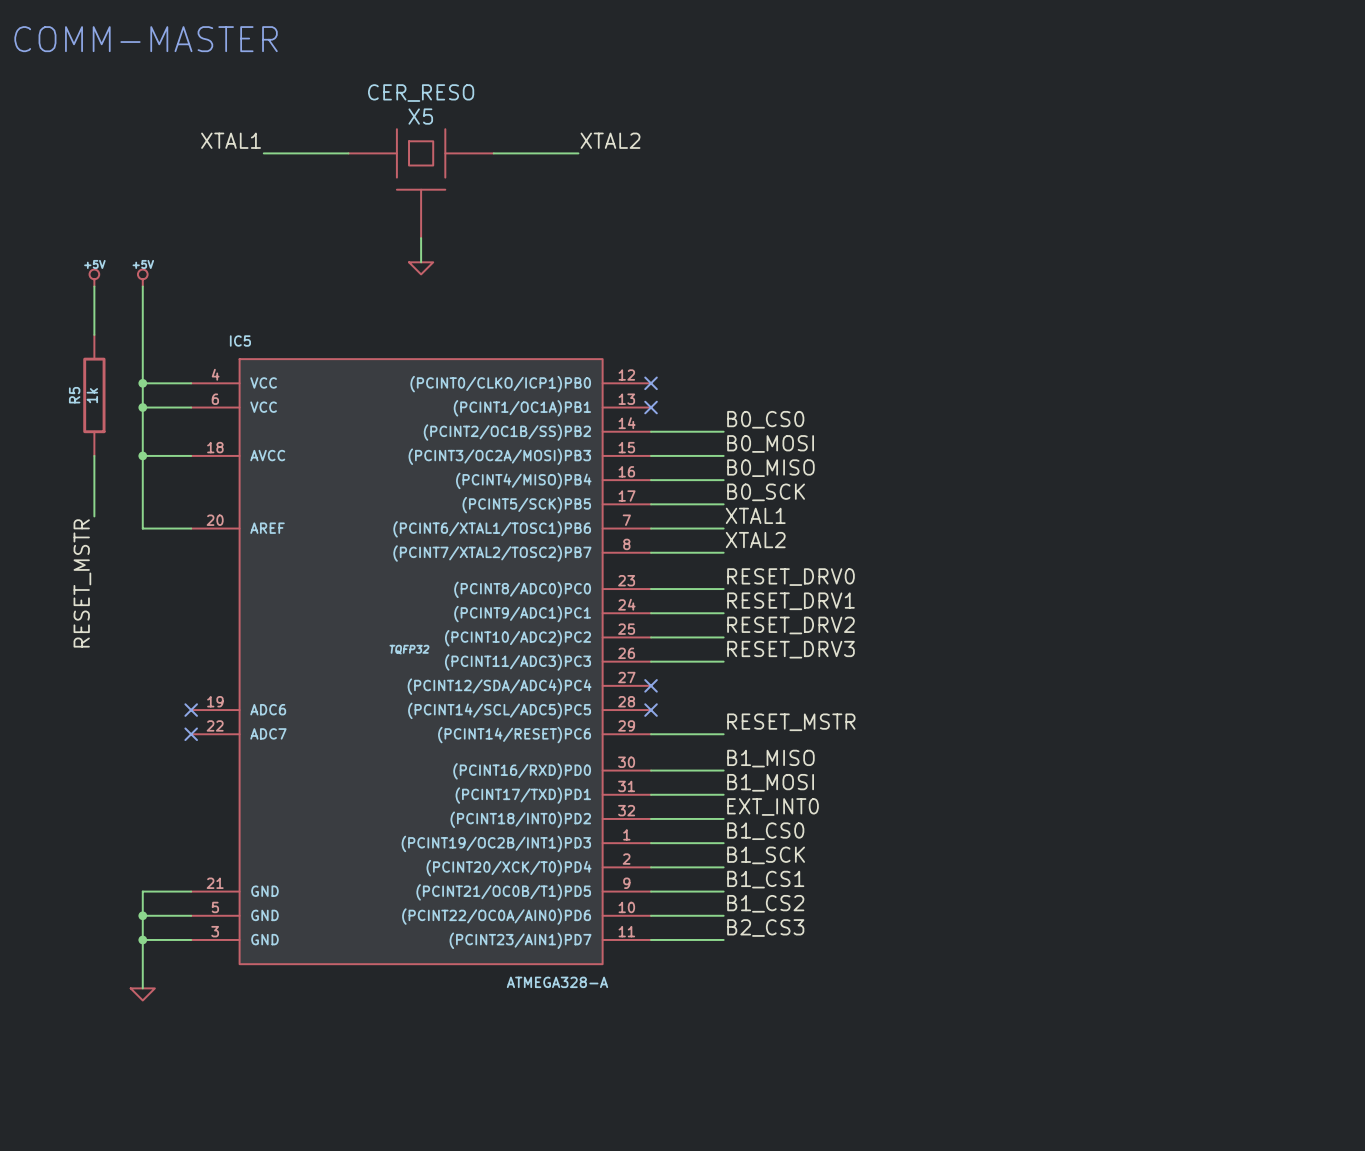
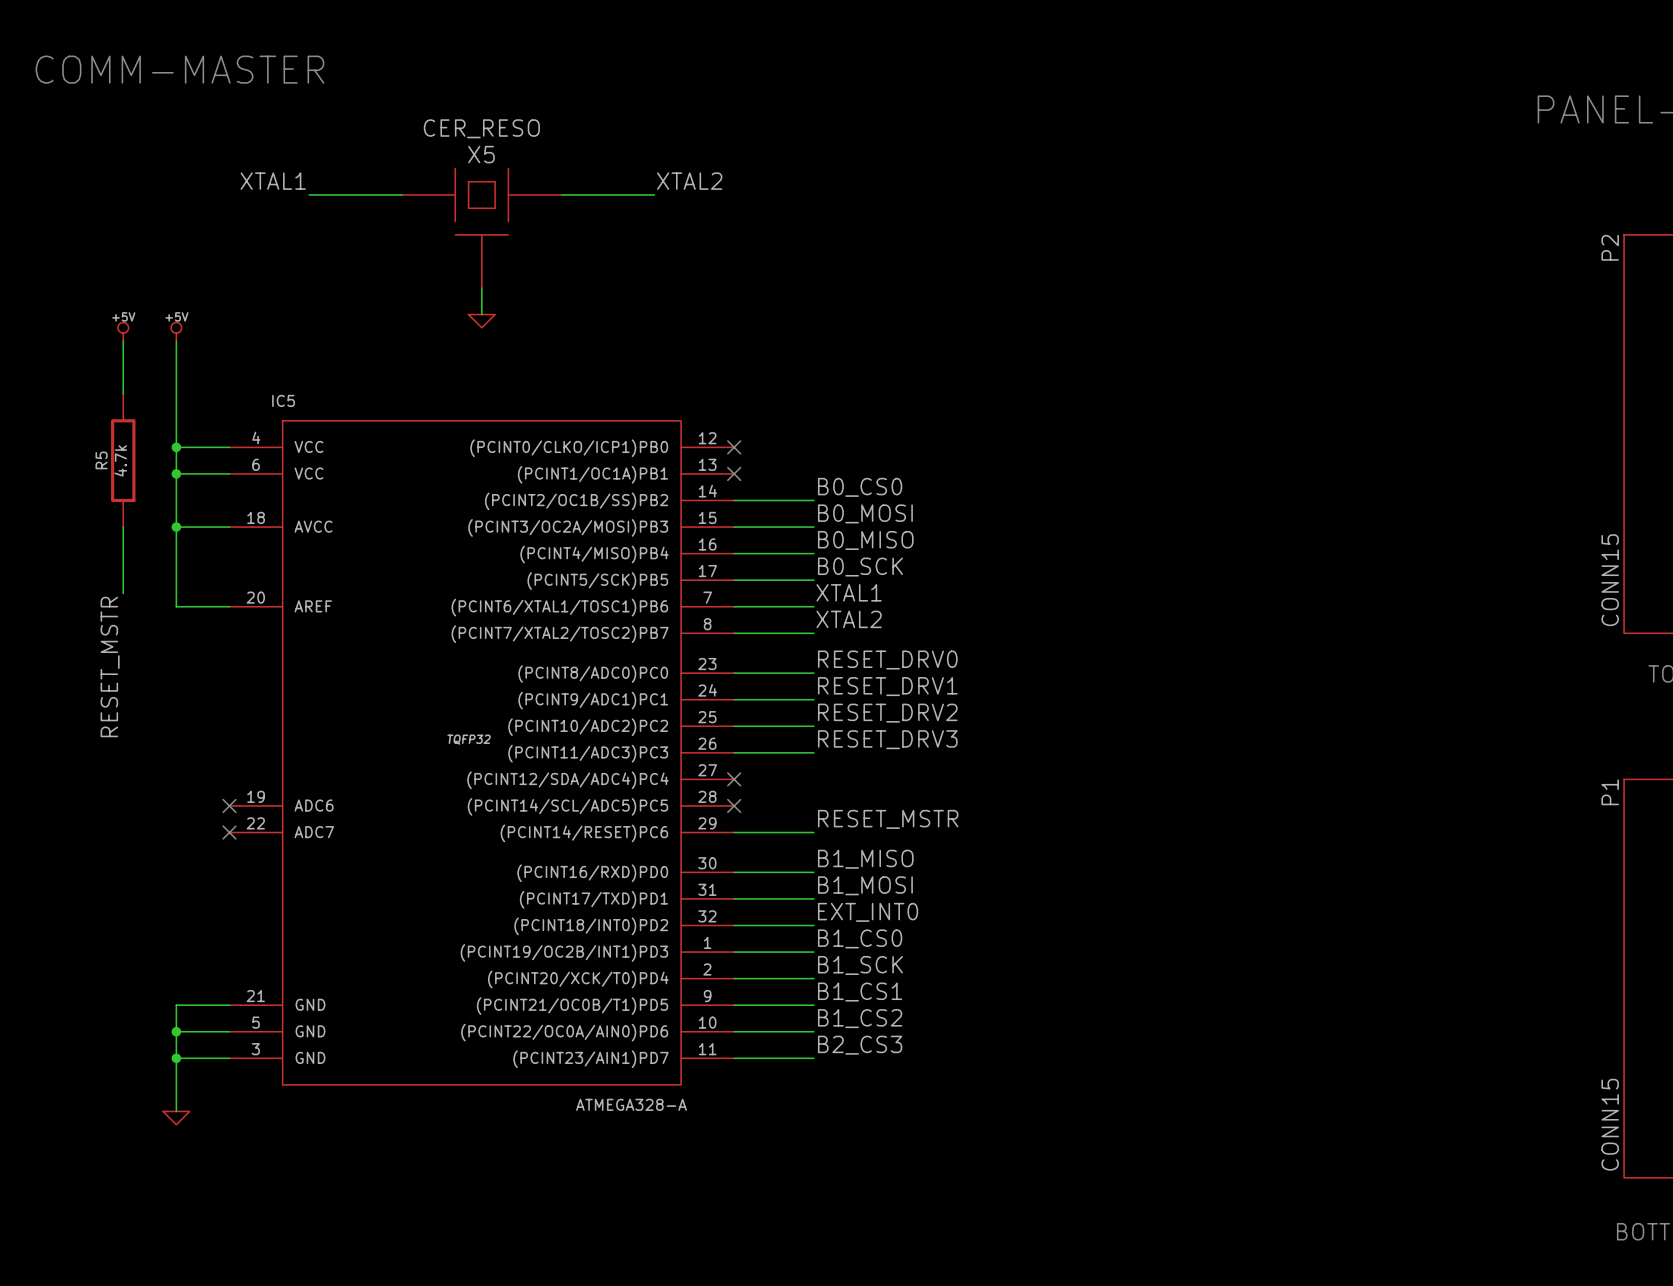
R5 value: 1k (92, 395) -> 4.7k (120, 460)

